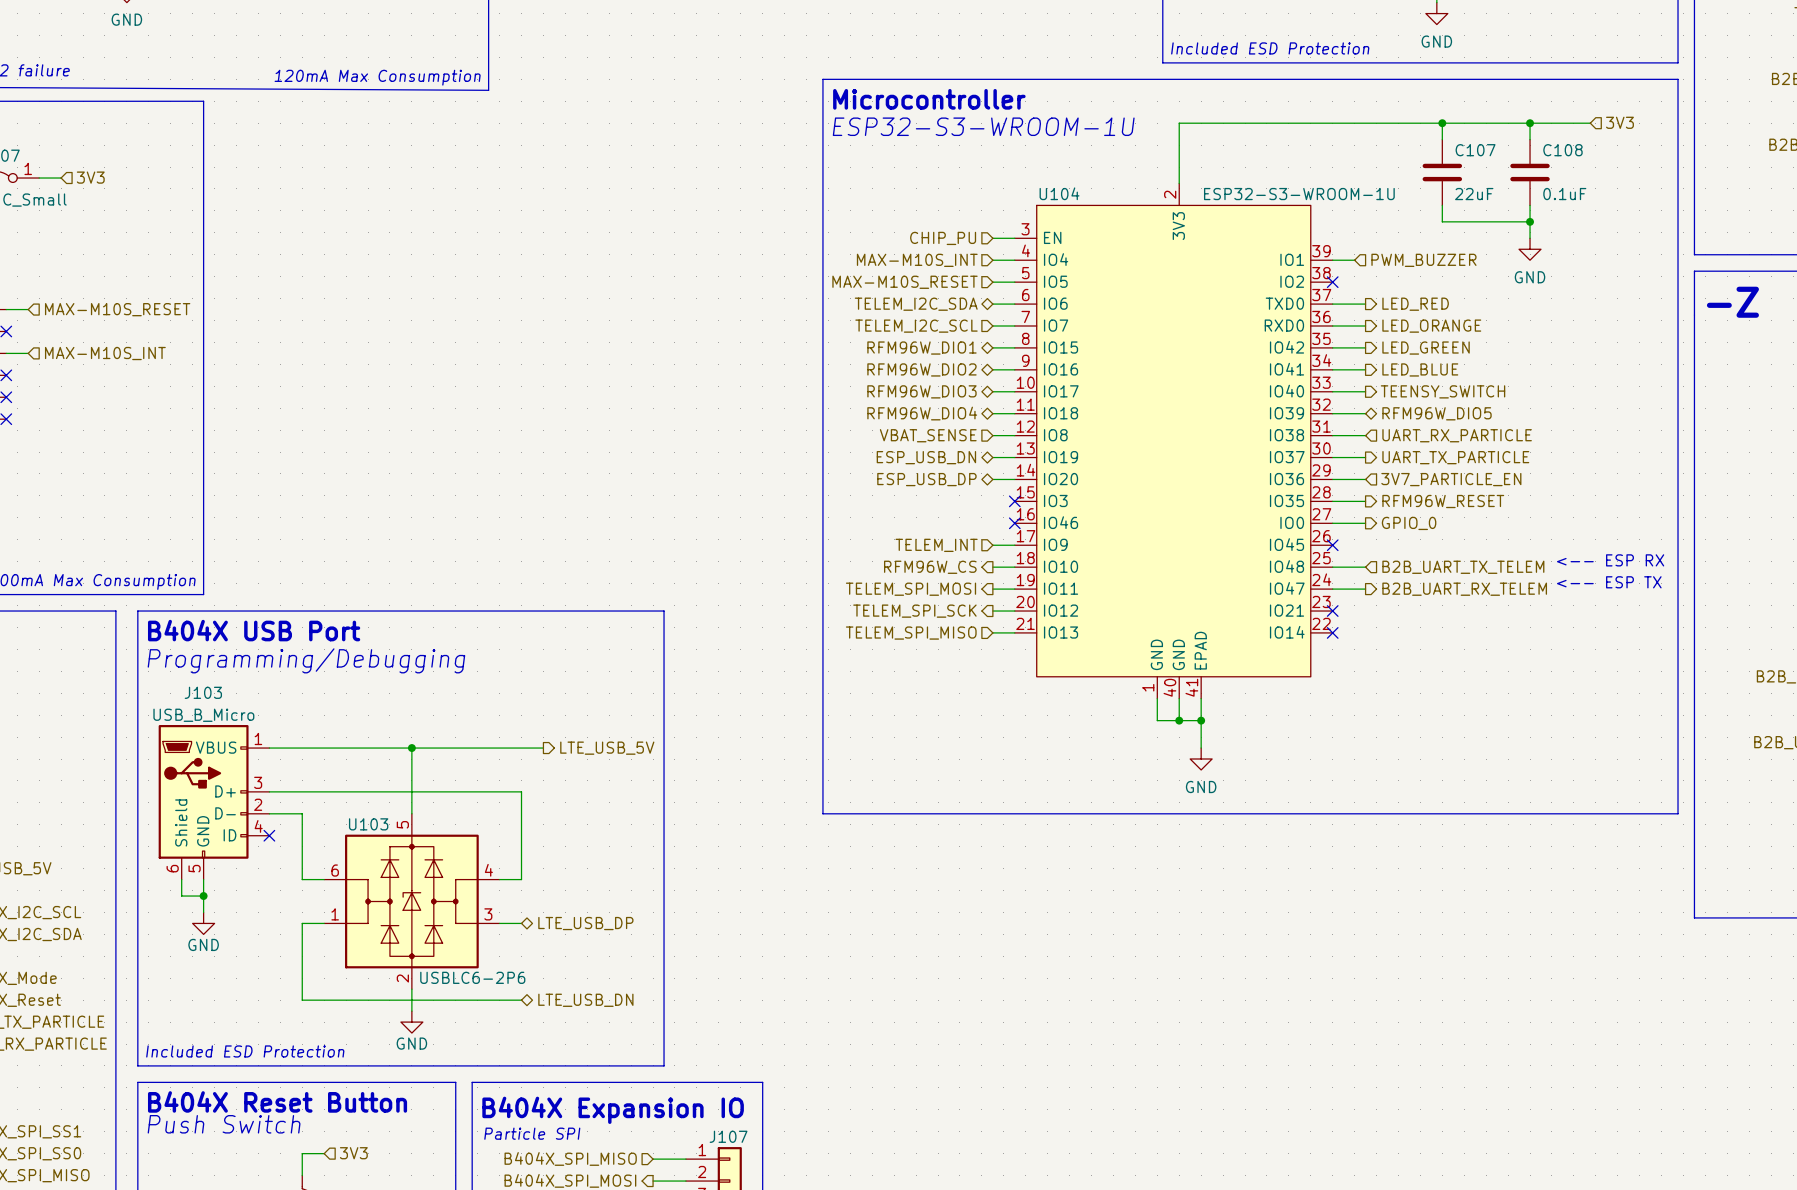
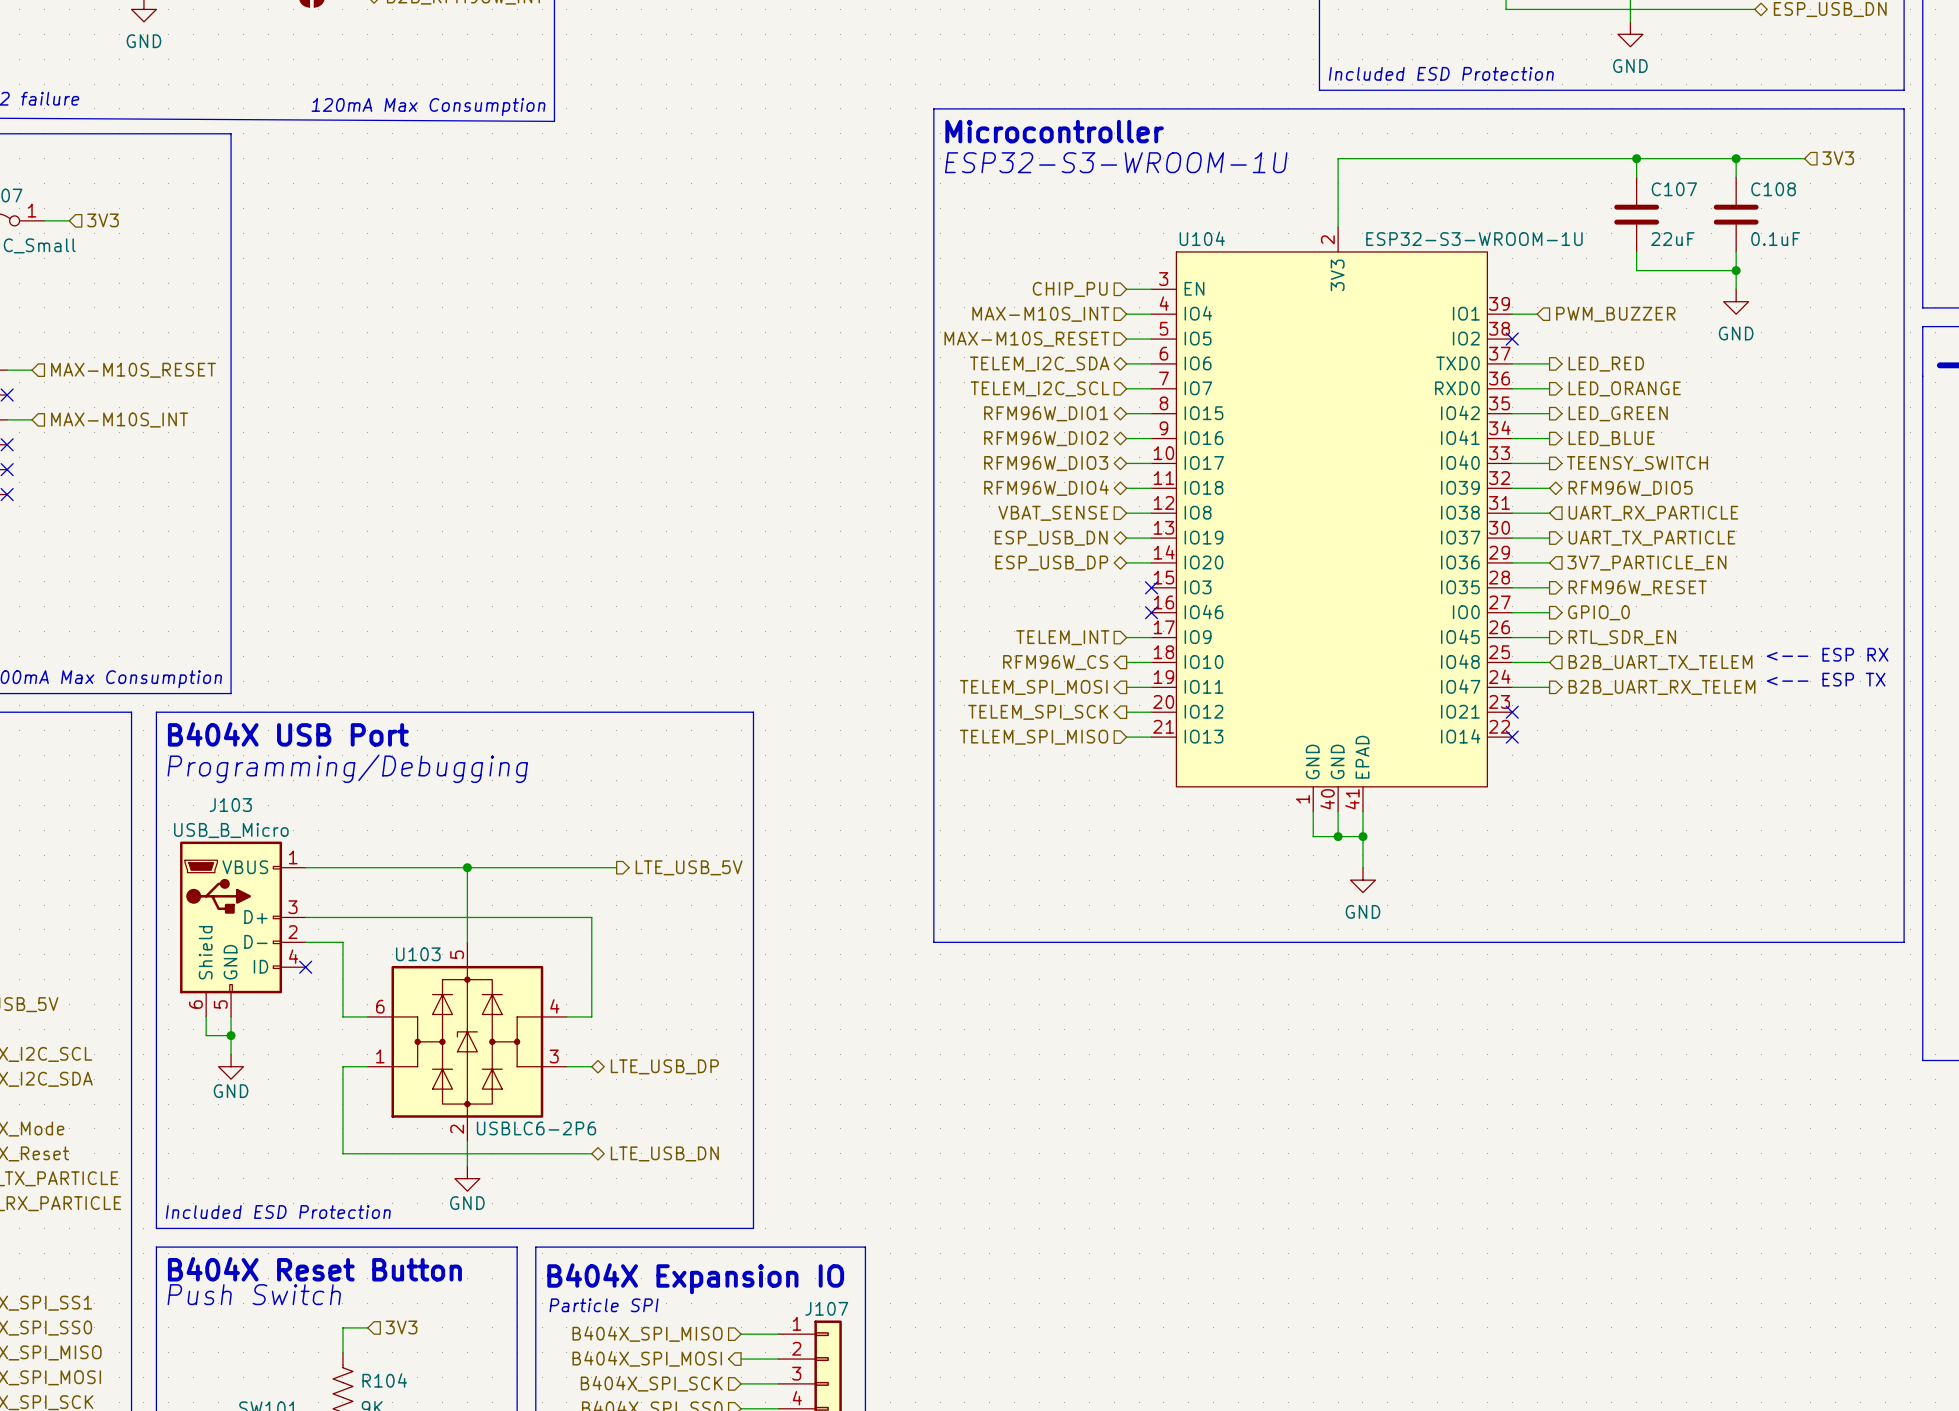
wire: none -> (1512, 637) (1549, 637)
no-connect mark: (1332, 545) -> none
hierarchical label: none -> RTL_SDR_EN (1622, 637)

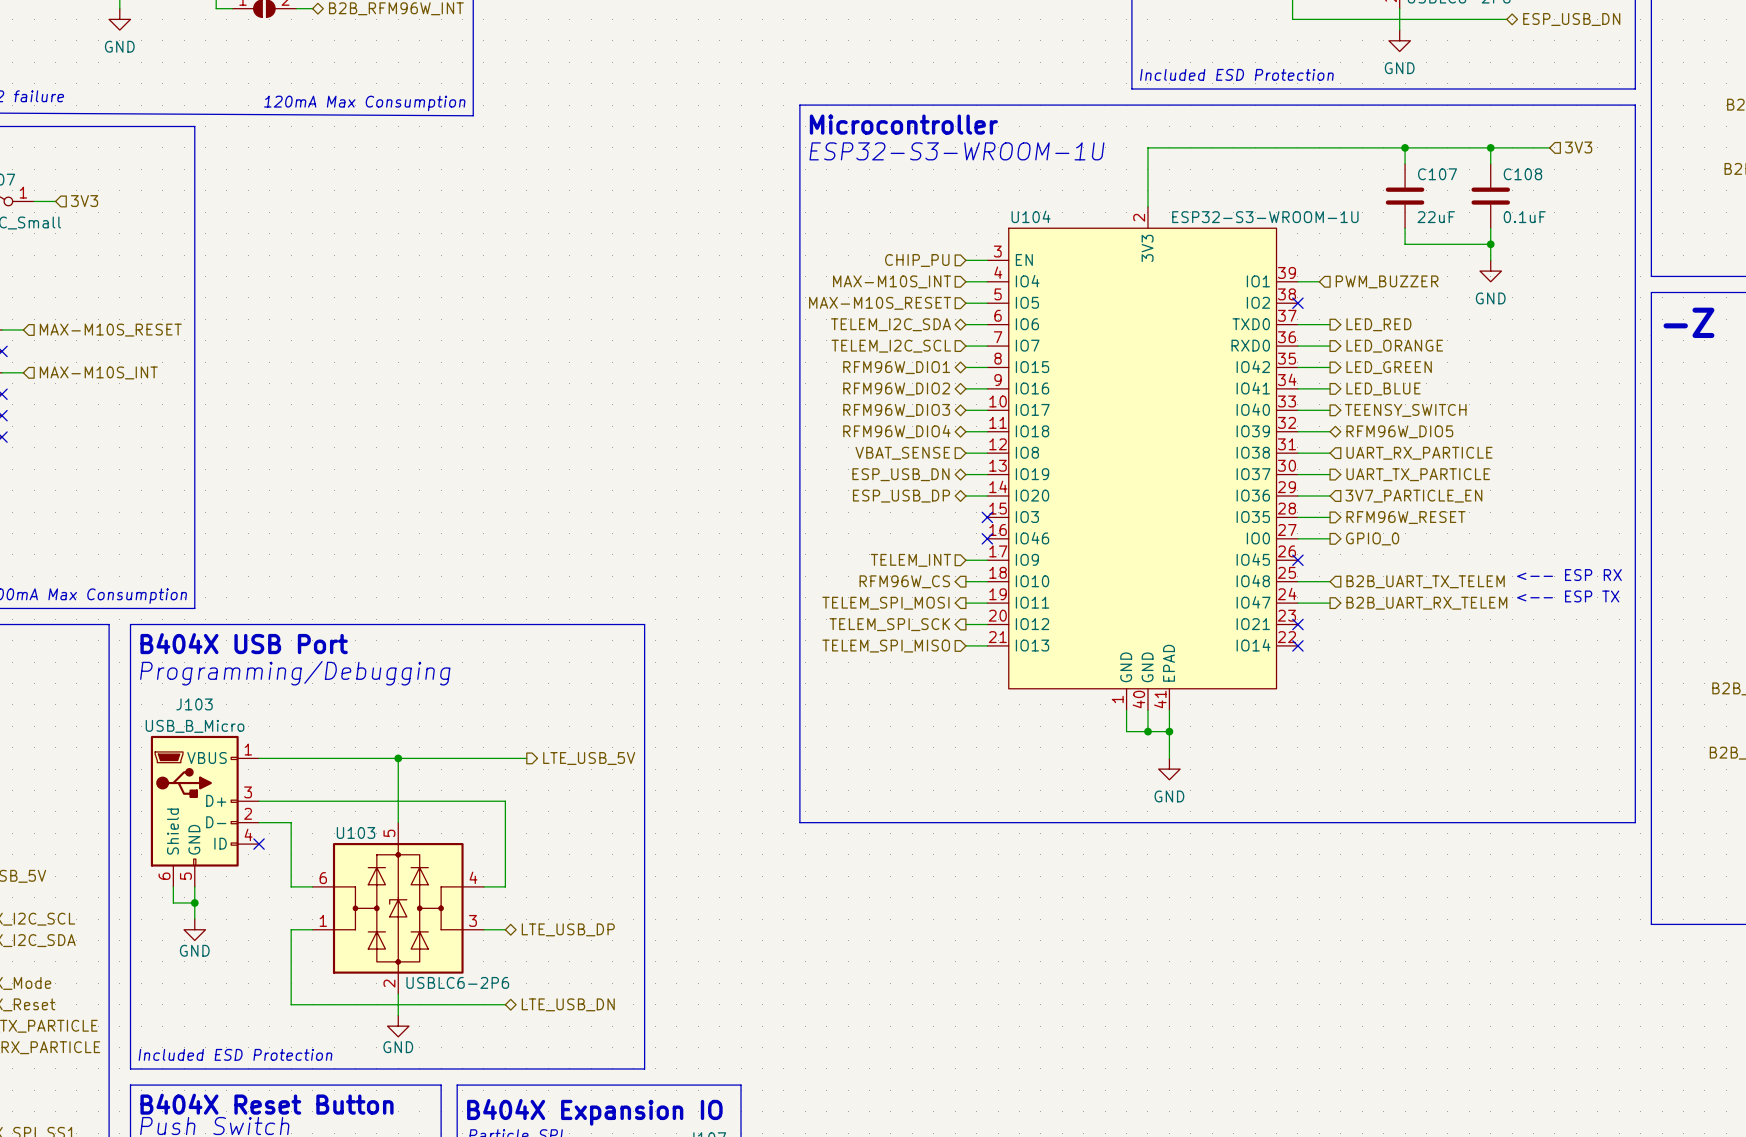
wire: (1512, 637) (1549, 637) -> none
no-connect mark: none -> (1297, 560)
hierarchical label: RTL_SDR_EN (1622, 637) -> none

